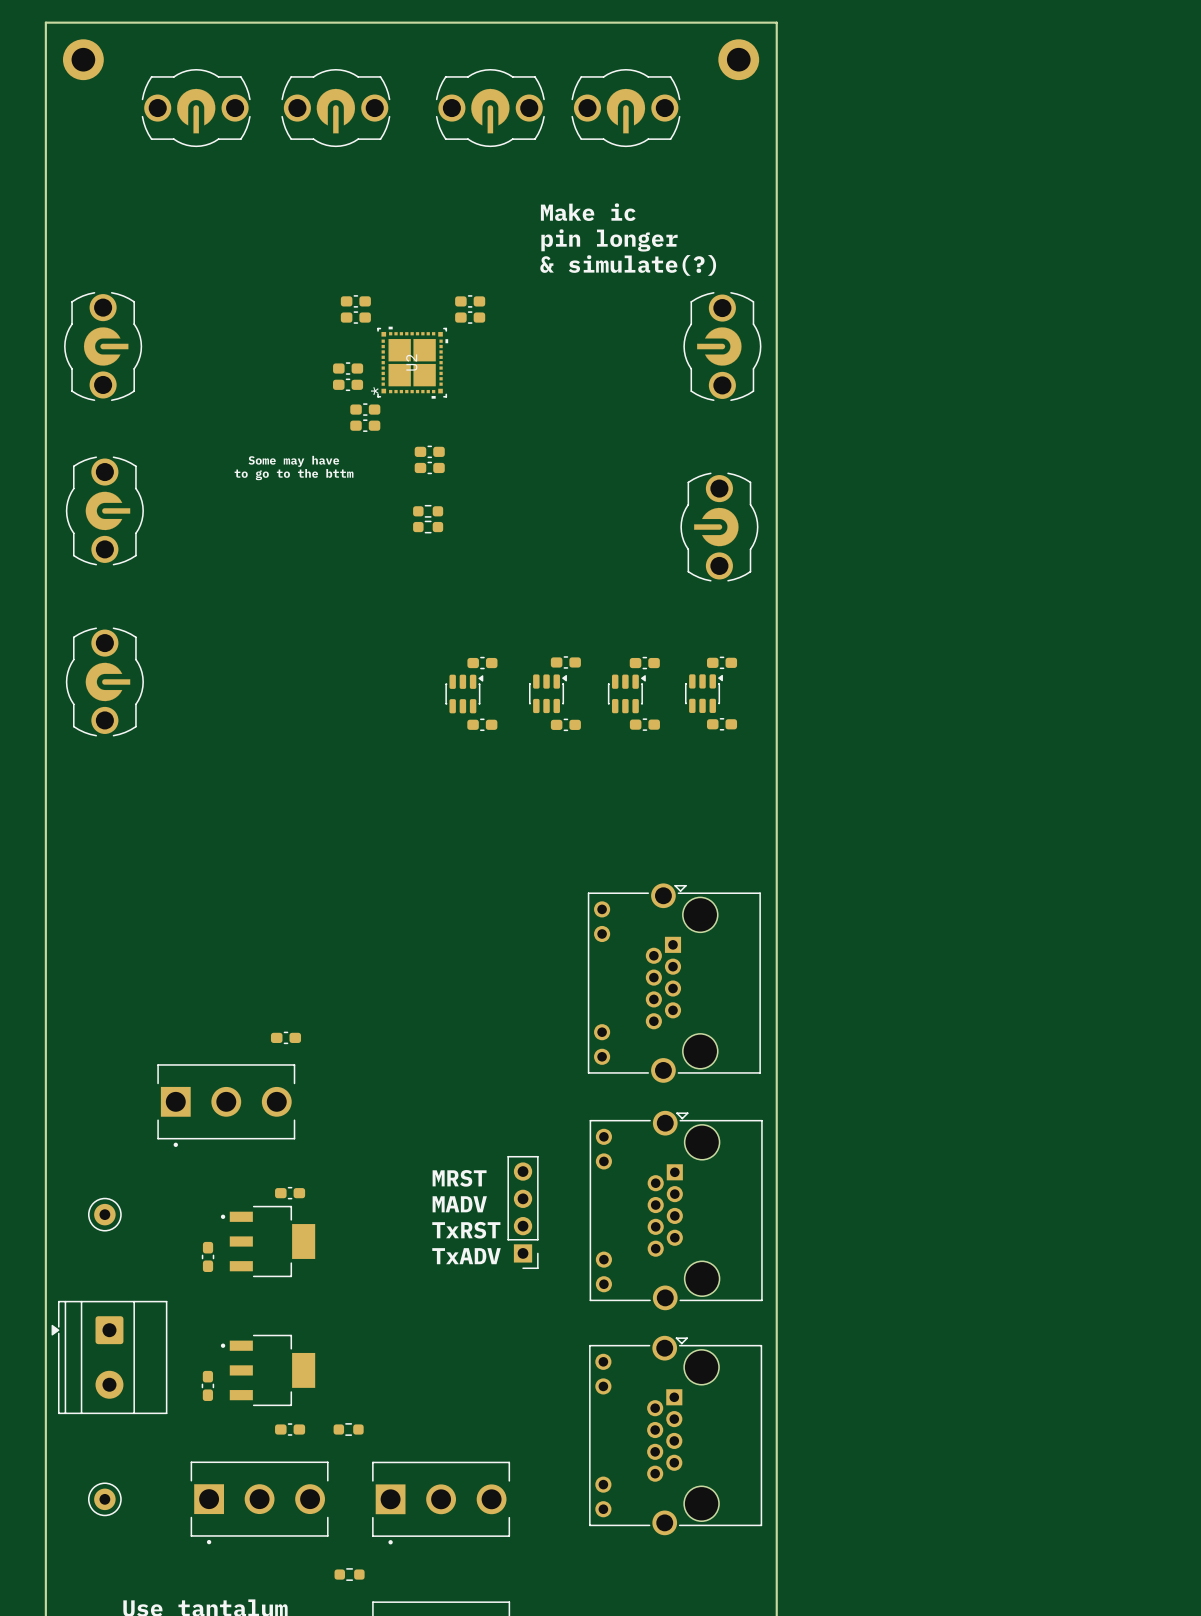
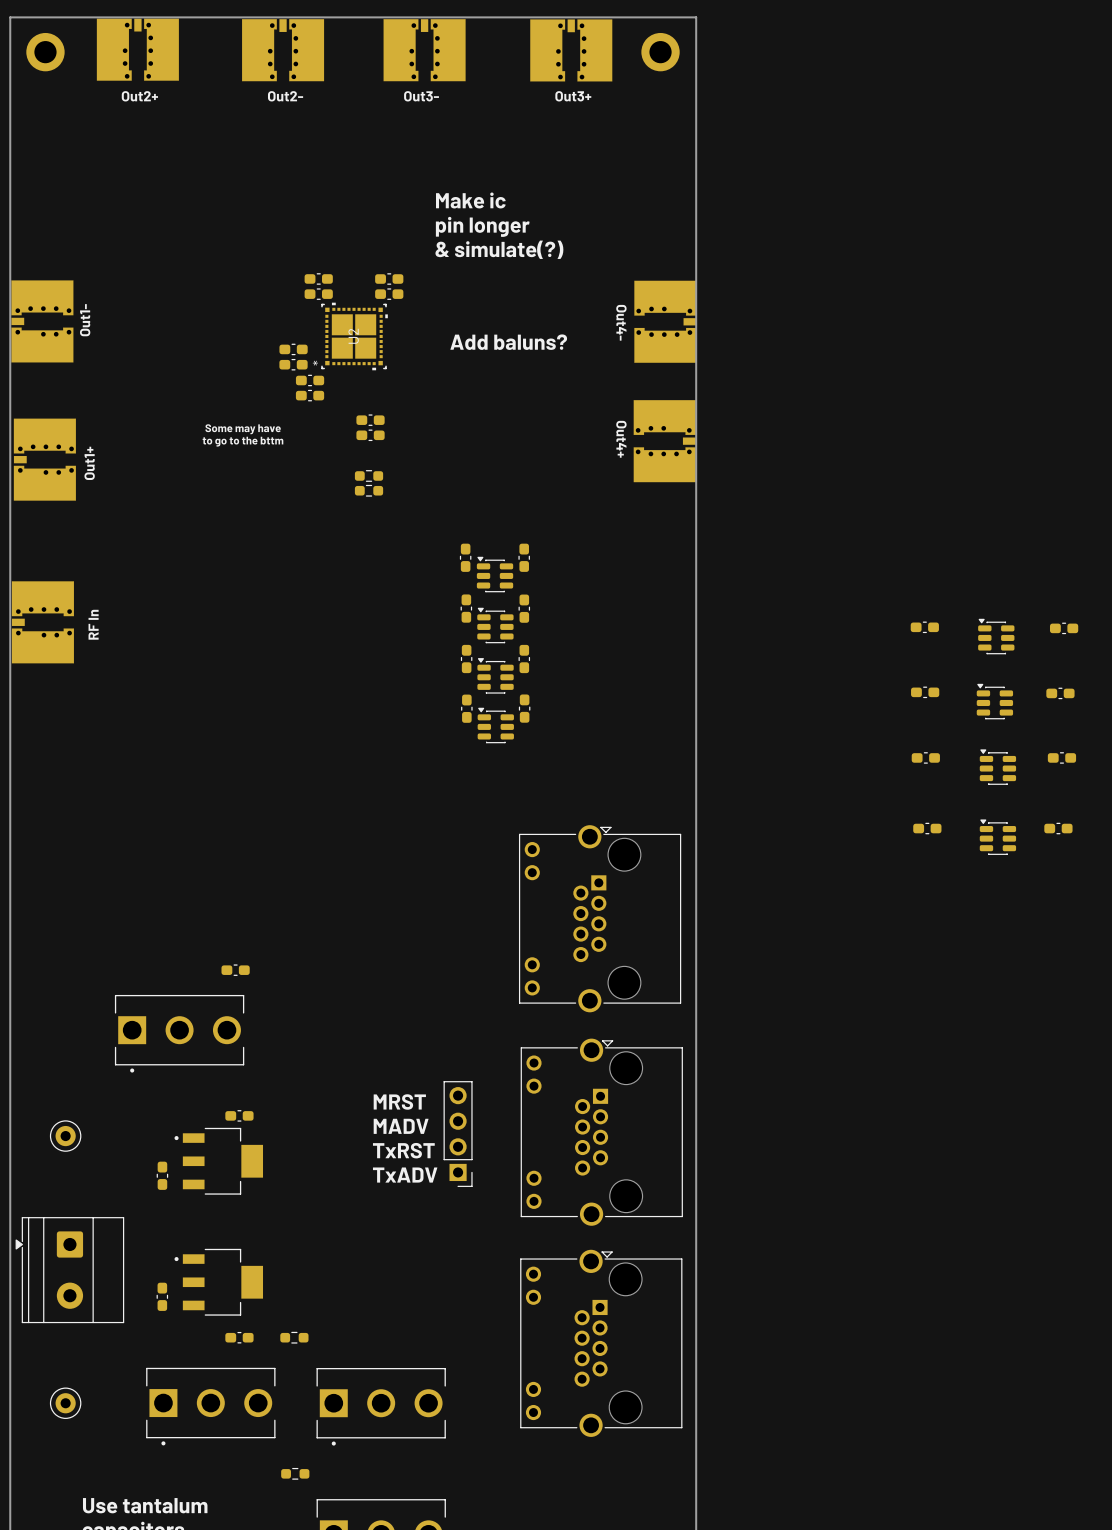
part: none -> (137, 49)
part: none -> (283, 50)
part: none -> (424, 50)
part: none -> (571, 50)
text: none -> Out2+ (139, 96)
text: none -> Out2- (285, 96)
text: none -> Out3- (421, 96)
text: none -> Out3+ (573, 96)
part: (196, 108) -> none
part: (335, 108) -> none
part: (490, 108) -> none
part: (625, 108) -> none
text position: Make ic (588, 212) -> Make ic (470, 200)
text position: pin longer (609, 240) -> pin longer (482, 226)
text position: & simulate(?) (628, 265) -> & simulate(?) (499, 249)
part: (355, 301) -> none
part: none -> (318, 278)
part: none -> (389, 279)
part: (470, 301) -> none
part: (355, 317) -> none
part: none -> (318, 294)
part: none -> (389, 294)
part: (470, 317) -> none
text: none -> Out1- (85, 320)
part: none -> (42, 321)
part: (103, 346) -> none
part: (722, 346) -> none
part: none -> (665, 321)
text: none -> Out4- (621, 322)
part: (348, 368) -> none
text: none -> Add baluns? (508, 342)
part: none -> (293, 349)
part: (348, 384) -> none
part: none -> (293, 364)
text: none -> Out4+ (621, 439)
part: none -> (664, 441)
part: none -> (44, 459)
text: none -> Out1+ (89, 463)
part: (104, 510) -> none
part: (719, 527) -> none
part: none -> (465, 557)
part: none -> (524, 557)
part: none -> (495, 574)
part: none -> (466, 608)
part: none -> (524, 608)
part footprint: [550, 656, 581, 669] -> [477, 607, 514, 644]
part: (722, 662) -> none
text: none -> RF In (93, 624)
part: (482, 663) -> none
part: (644, 663) -> none
part: none -> (42, 622)
part: none -> (924, 627)
part: none -> (1064, 628)
part: (104, 681) -> none
part: none -> (996, 636)
part: (548, 693) -> none
part: (626, 693) -> none
part: (704, 693) -> none
part: (464, 694) -> none
part: none -> (466, 659)
part: none -> (524, 659)
part footprint: [550, 718, 581, 731] -> [477, 658, 514, 694]
part: (482, 724) -> none
part: (644, 724) -> none
part: (722, 724) -> none
part: none -> (925, 692)
part: none -> (1060, 693)
part: none -> (994, 701)
part: none -> (466, 708)
part: none -> (524, 708)
part: none -> (495, 725)
part: none -> (925, 757)
part: none -> (1061, 757)
part: none -> (997, 767)
part: none -> (927, 828)
part: none -> (1058, 828)
part: none -> (997, 837)

